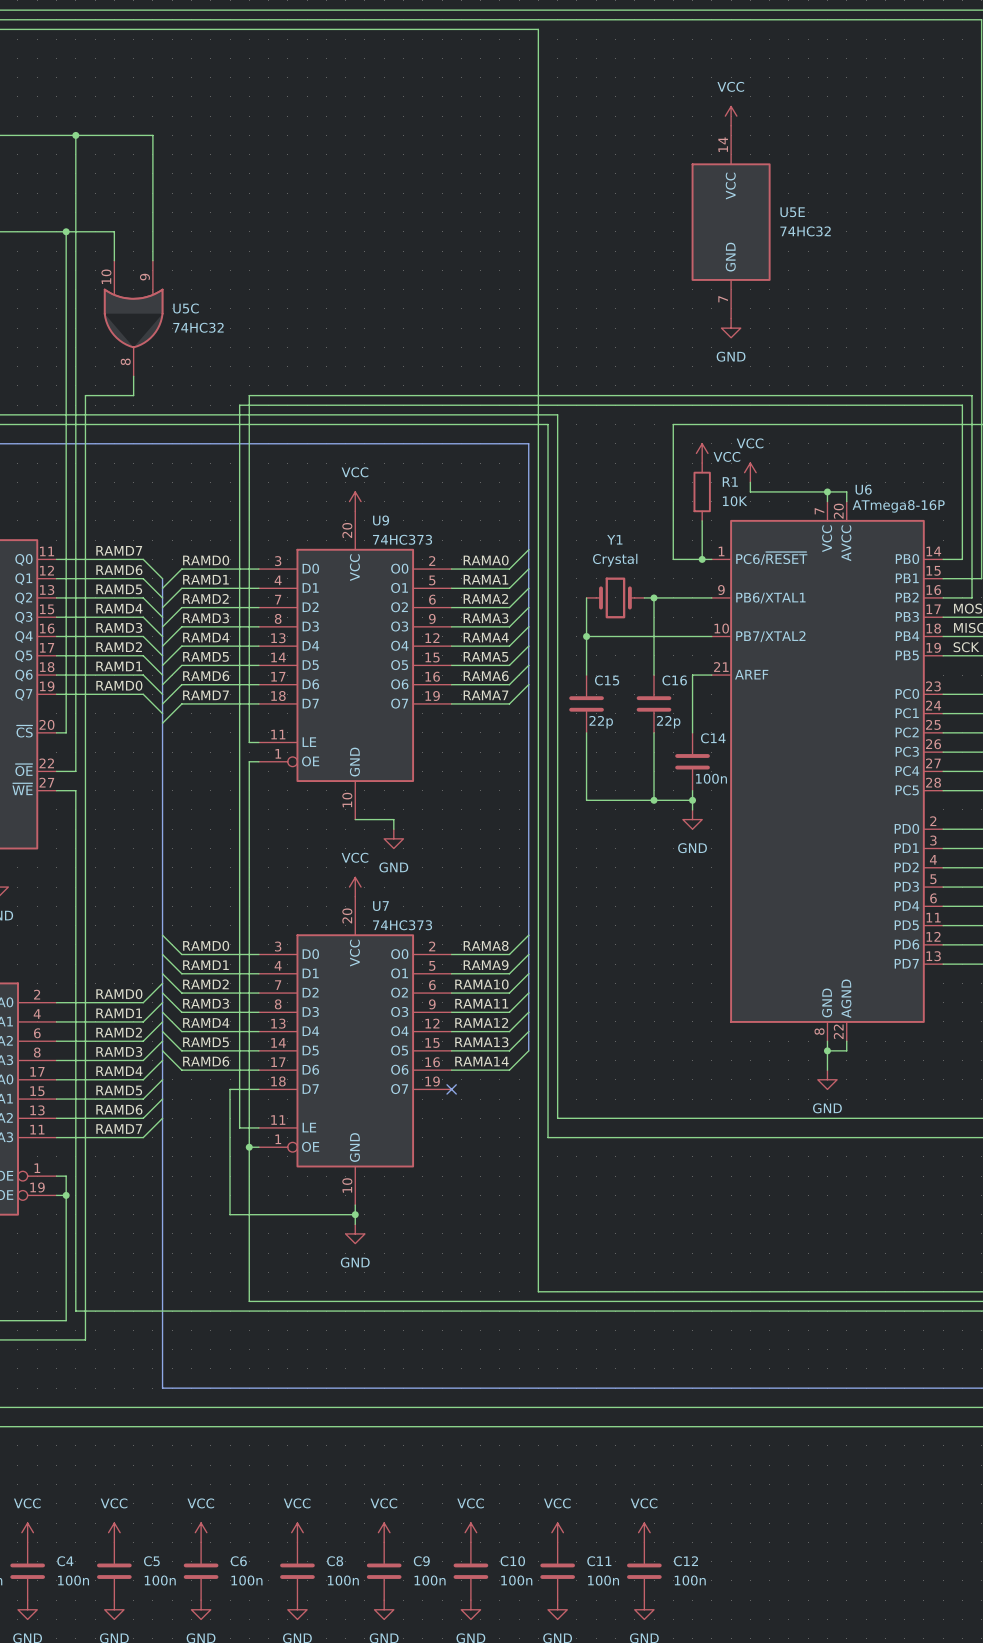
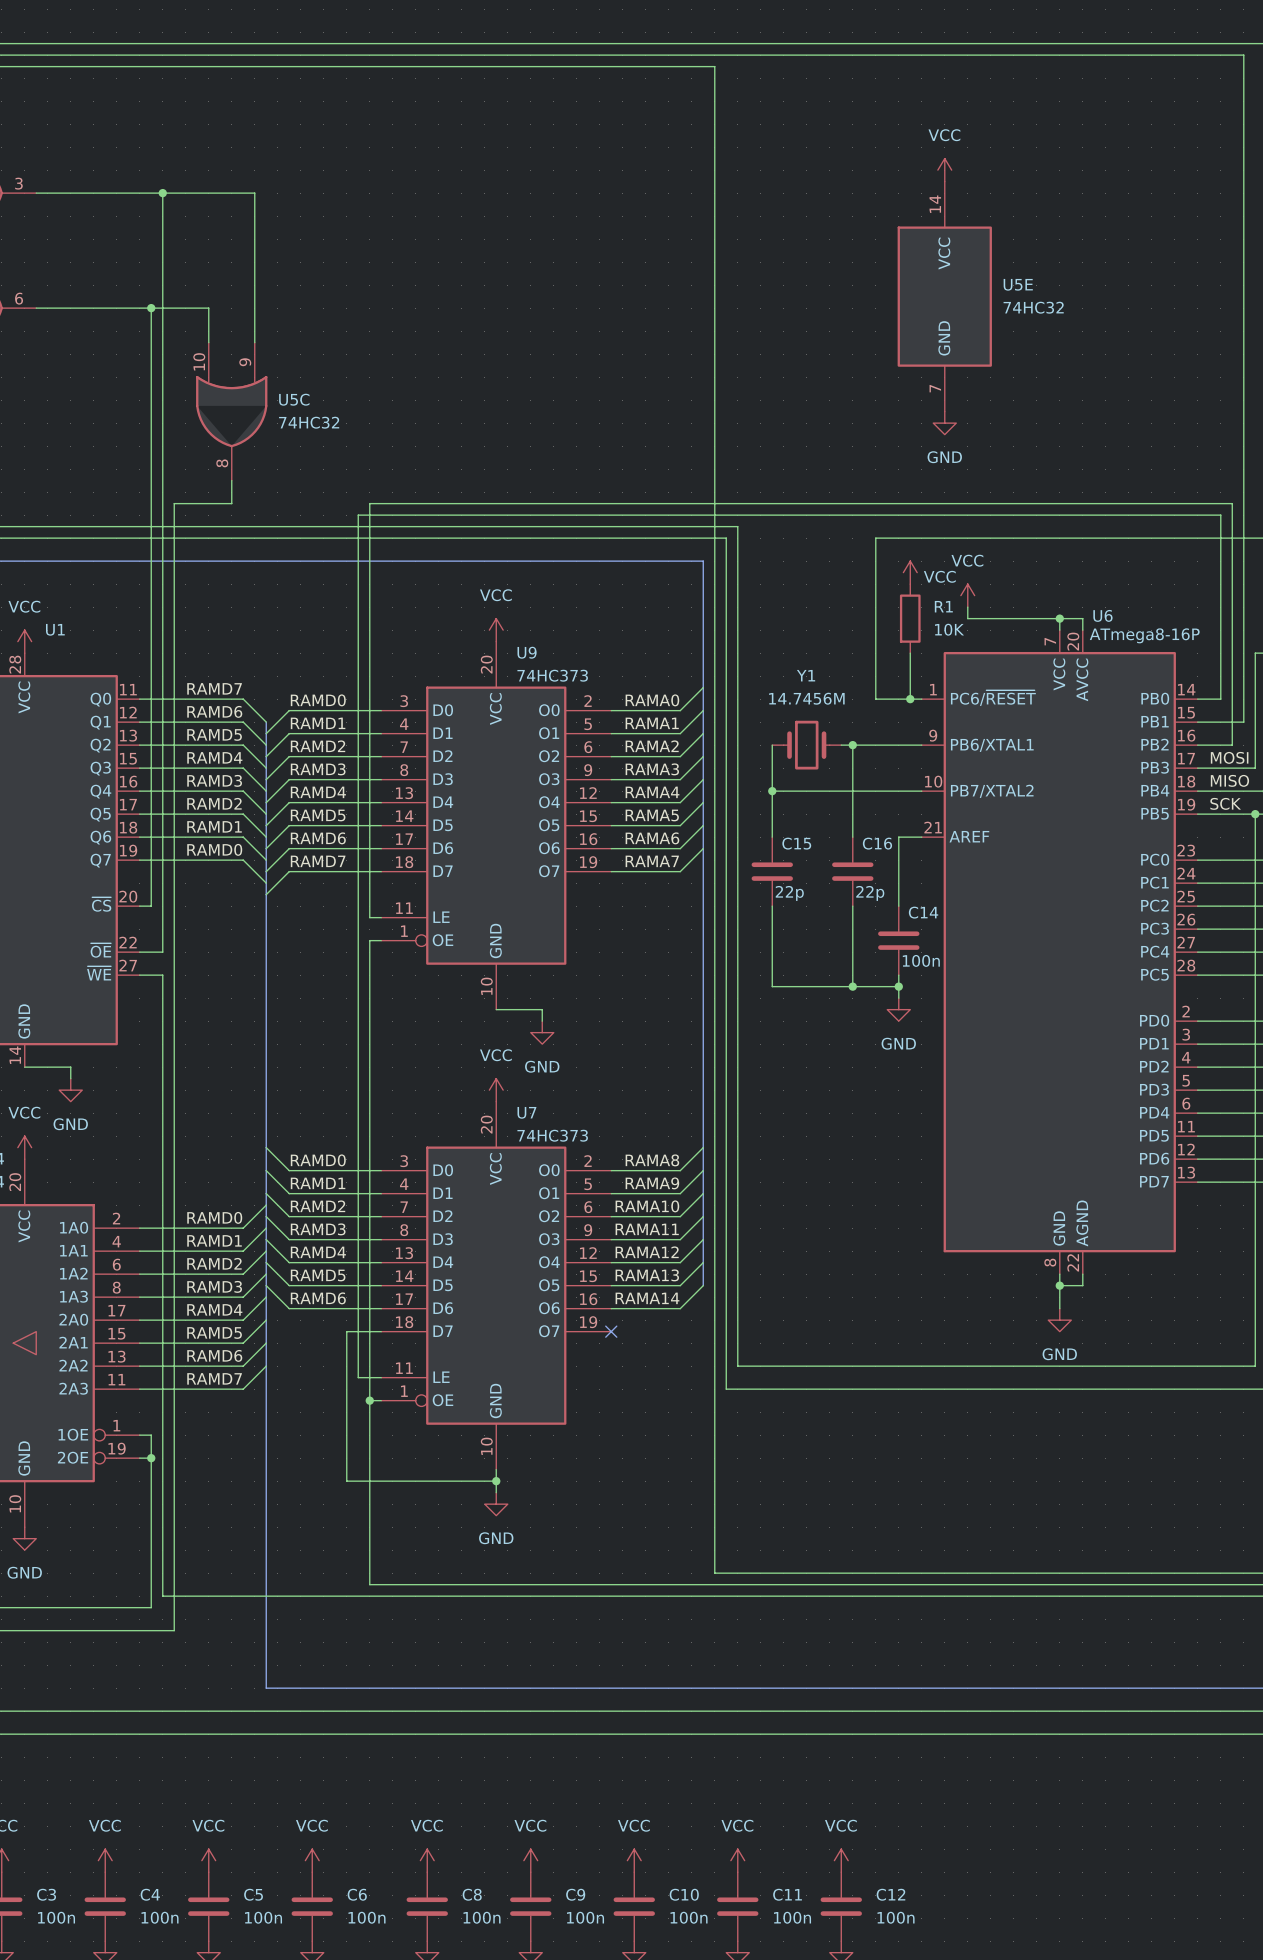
Y1 value: Crystal (615, 560) -> 14.7456M (806, 698)

